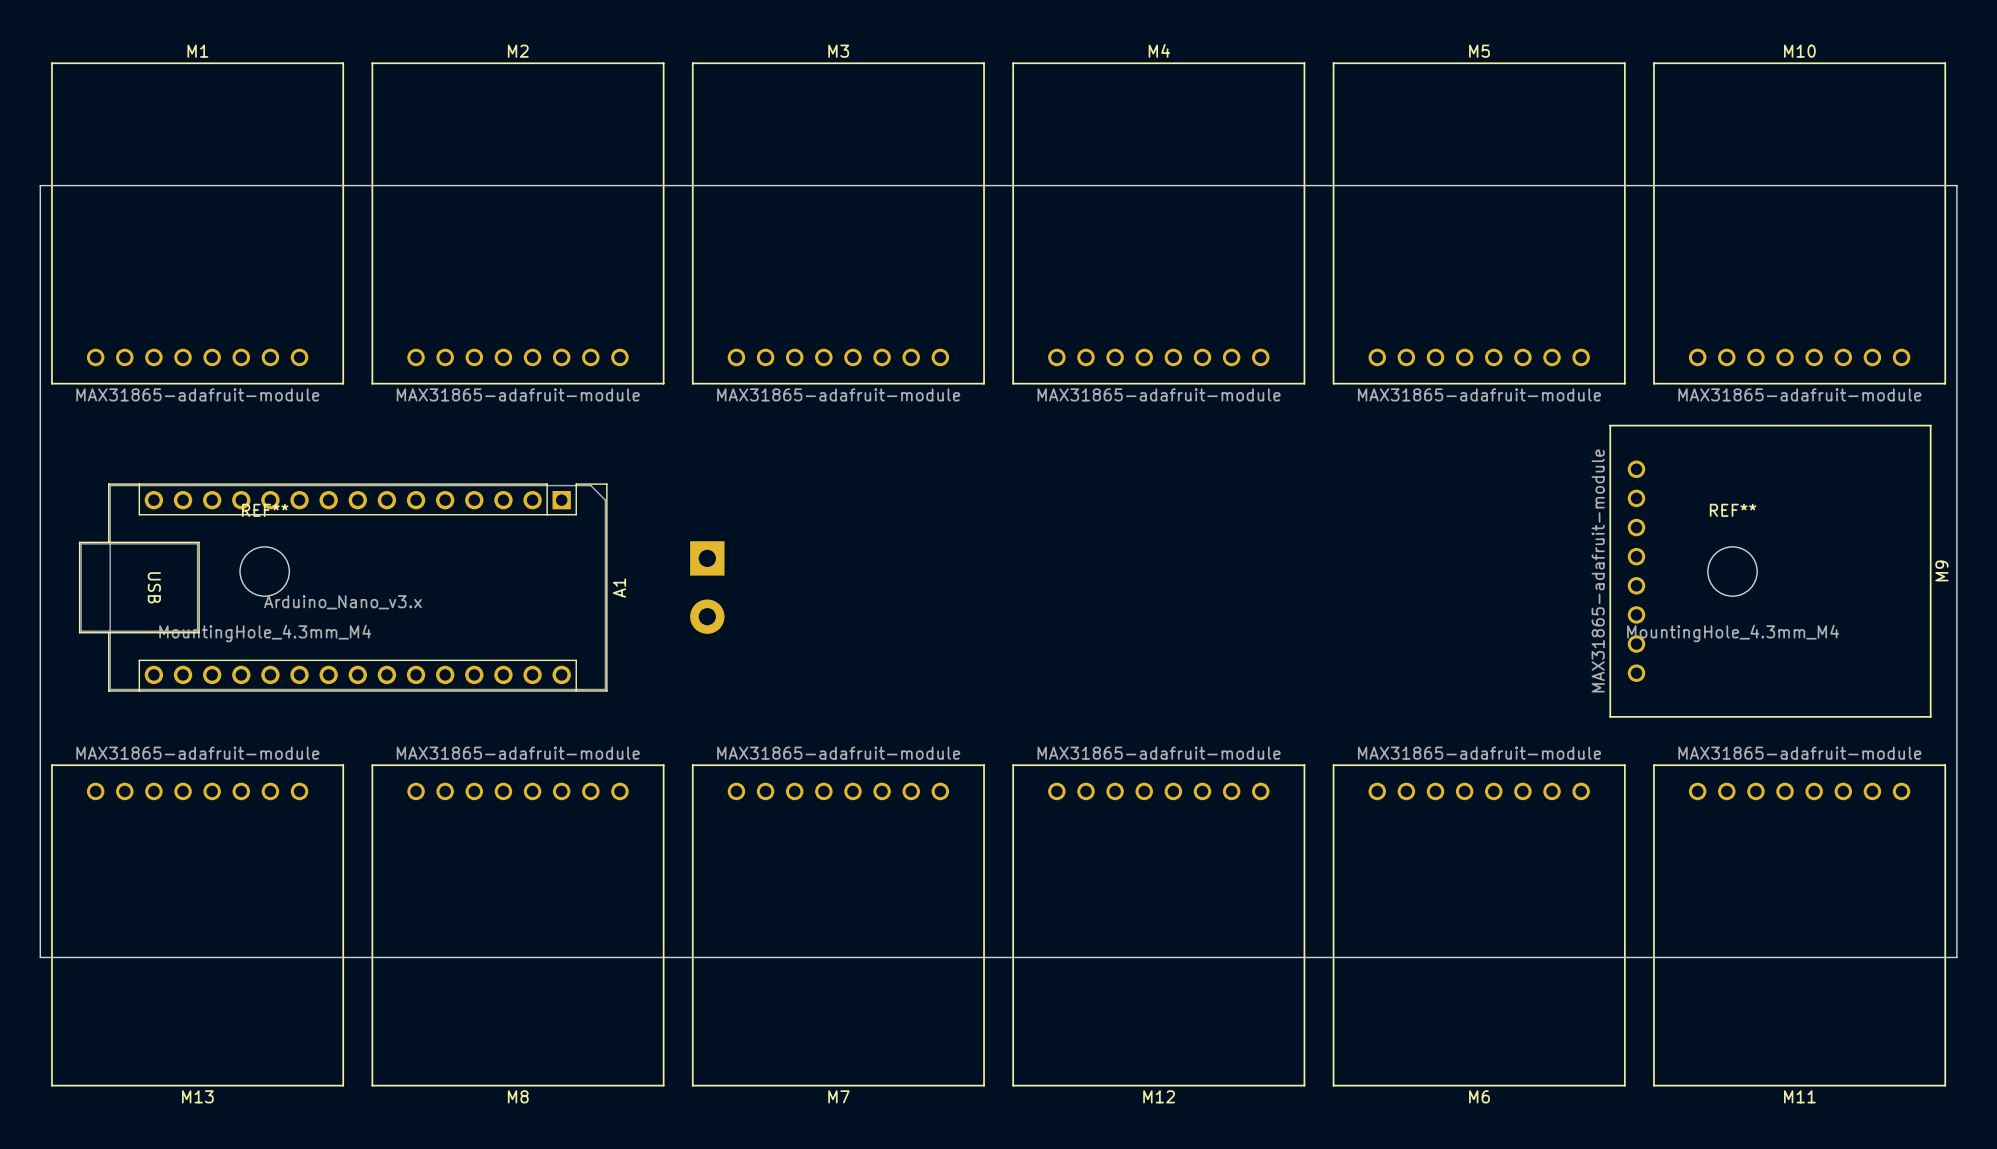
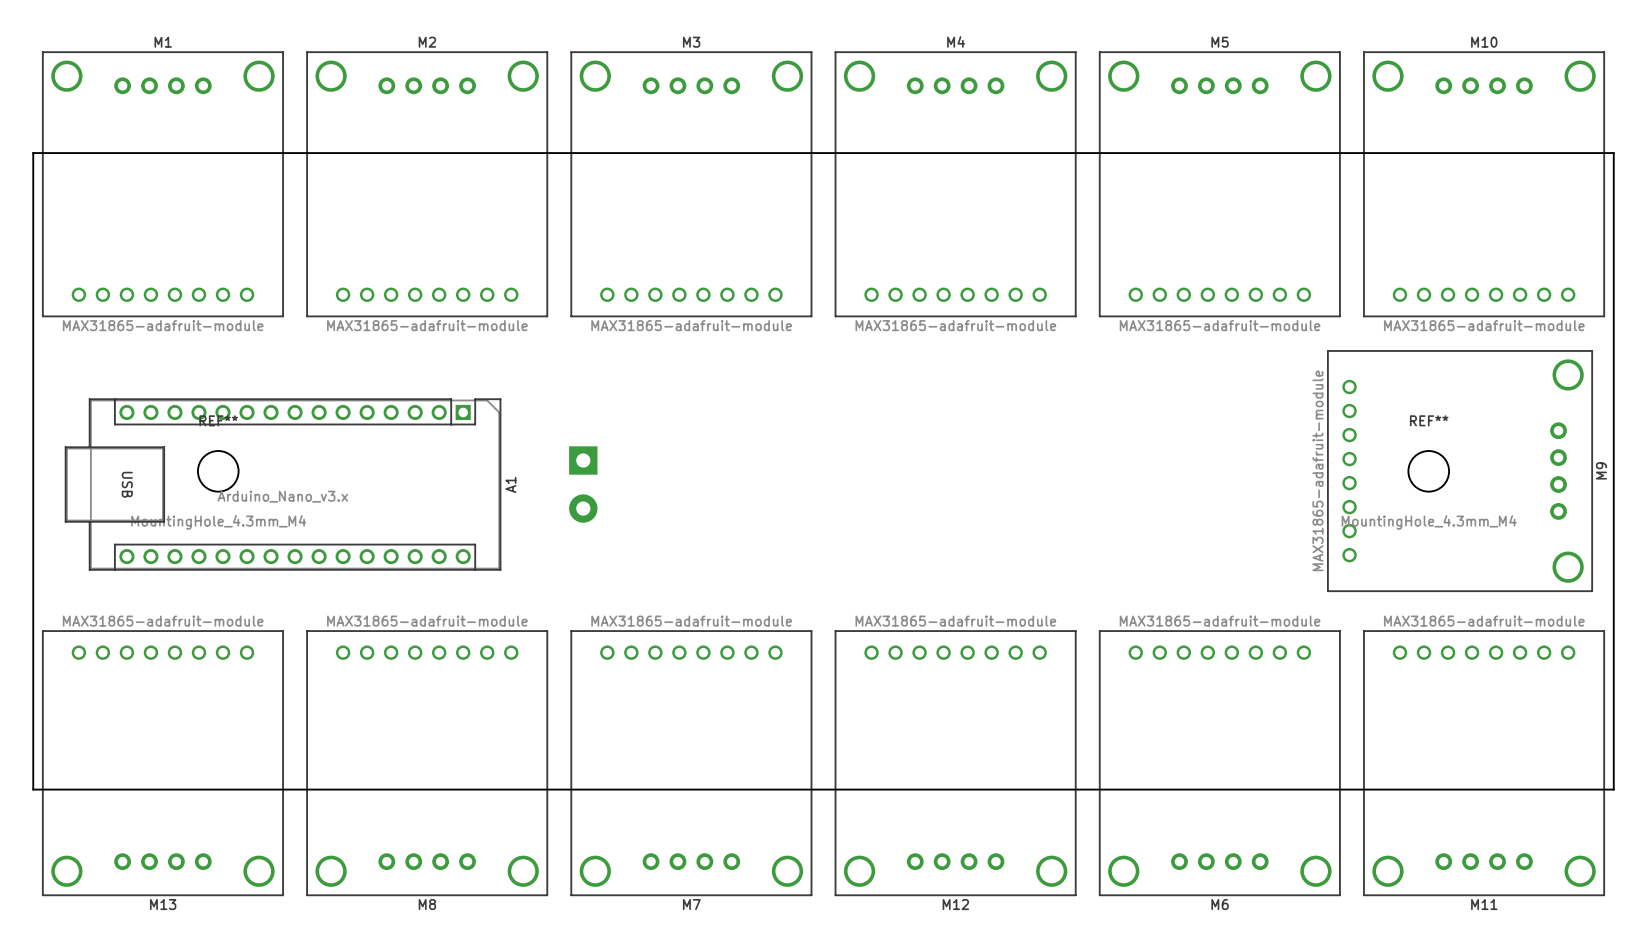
M1 footprint: [51, 62, 345, 385] -> [42, 51, 284, 318]
M2 footprint: [371, 62, 665, 385] -> [306, 51, 548, 318]
M3 footprint: [691, 62, 985, 385] -> [570, 51, 813, 318]
M4 footprint: [1012, 62, 1306, 385] -> [834, 51, 1077, 318]
M5 footprint: [1332, 62, 1626, 385] -> [1099, 51, 1341, 318]
M10 footprint: [1653, 62, 1947, 385] -> [1363, 51, 1605, 318]
M9 footprint: [1609, 424, 1932, 718] -> [1327, 350, 1593, 592]
M13 footprint: [51, 764, 345, 1087] -> [42, 630, 284, 896]
M8 footprint: [371, 764, 665, 1087] -> [306, 630, 548, 896]
M7 footprint: [691, 764, 985, 1087] -> [570, 630, 813, 896]
M12 footprint: [1012, 764, 1306, 1087] -> [834, 630, 1077, 896]
M6 footprint: [1332, 764, 1626, 1087] -> [1099, 630, 1341, 896]
M11 footprint: [1653, 764, 1947, 1087] -> [1363, 630, 1605, 896]

